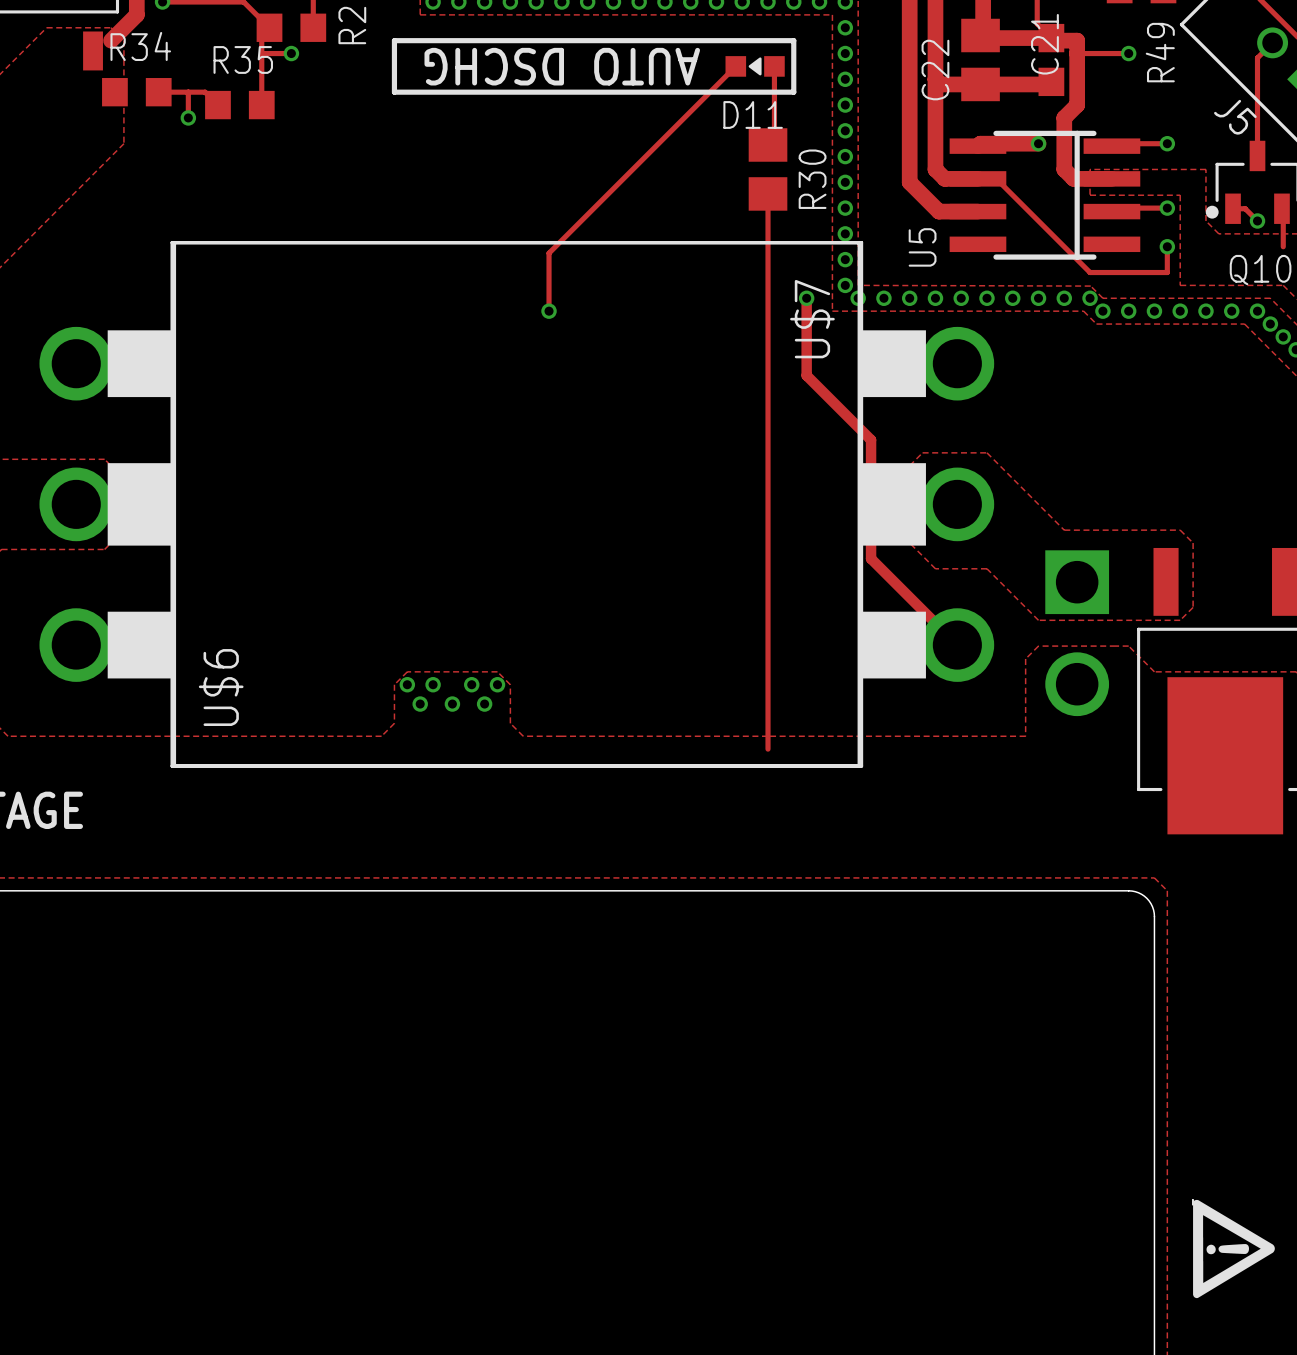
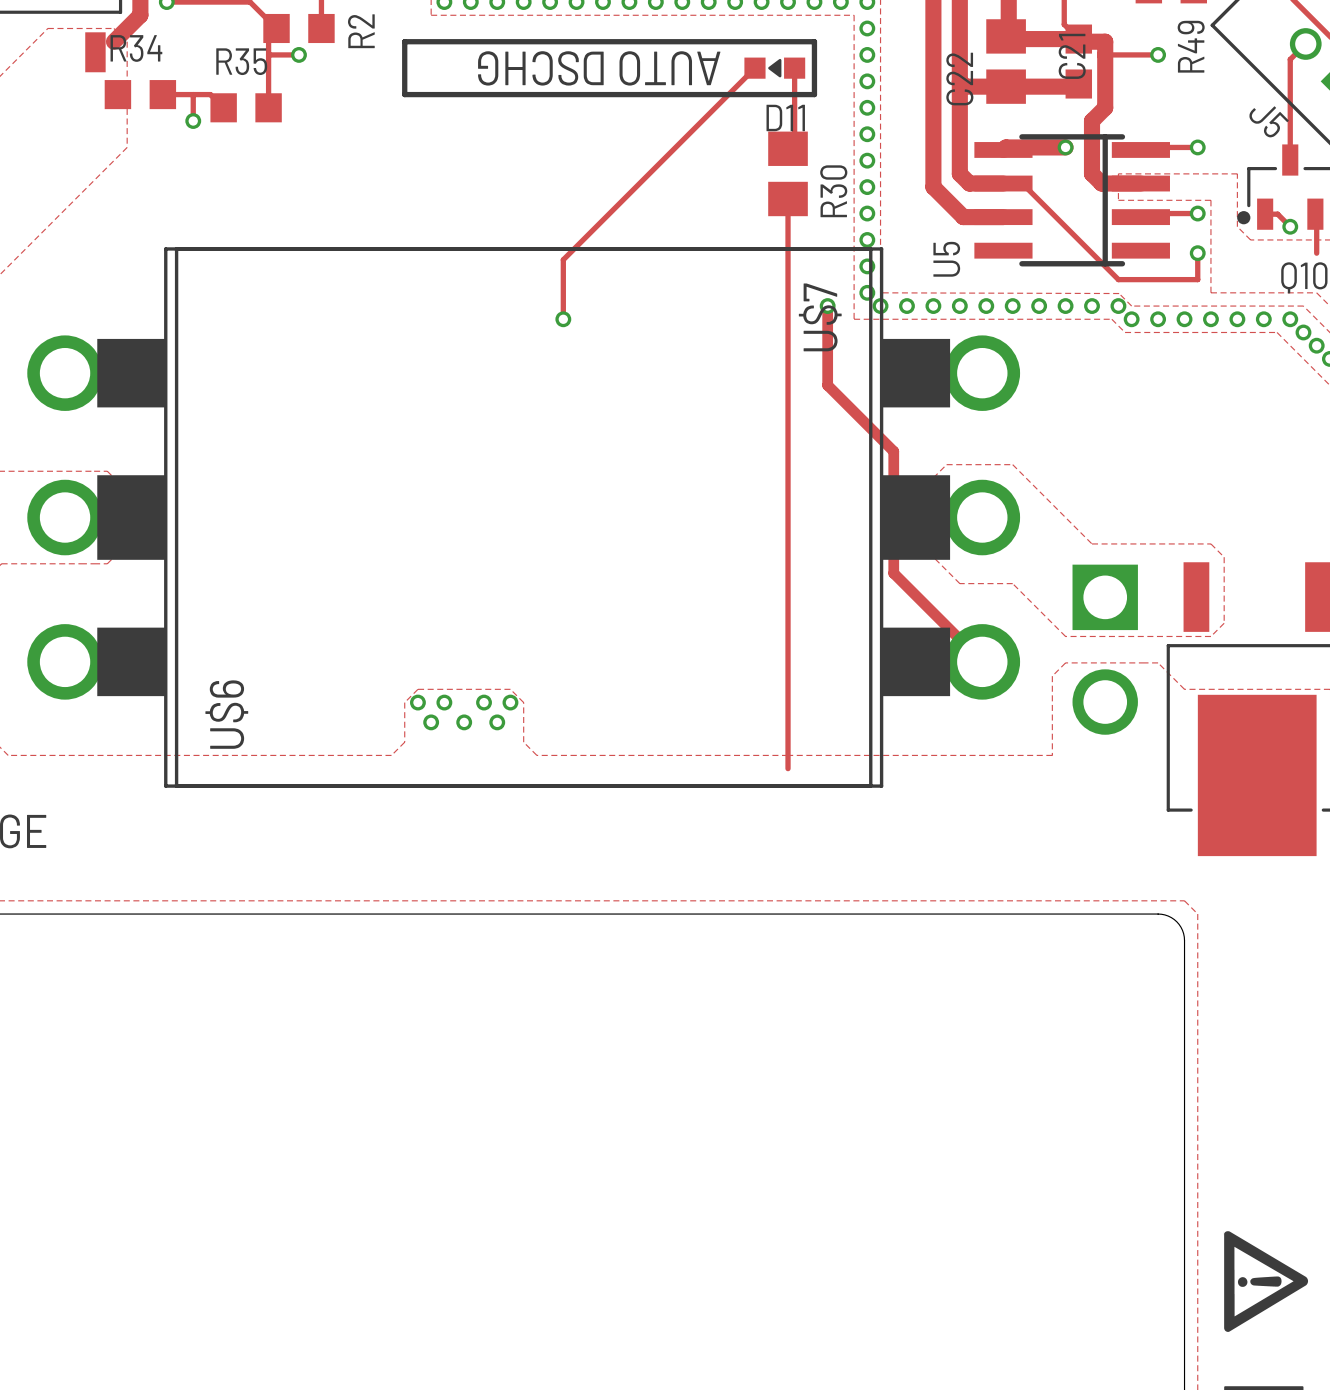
U$7 position: (451, 504) -> (449, 517)

